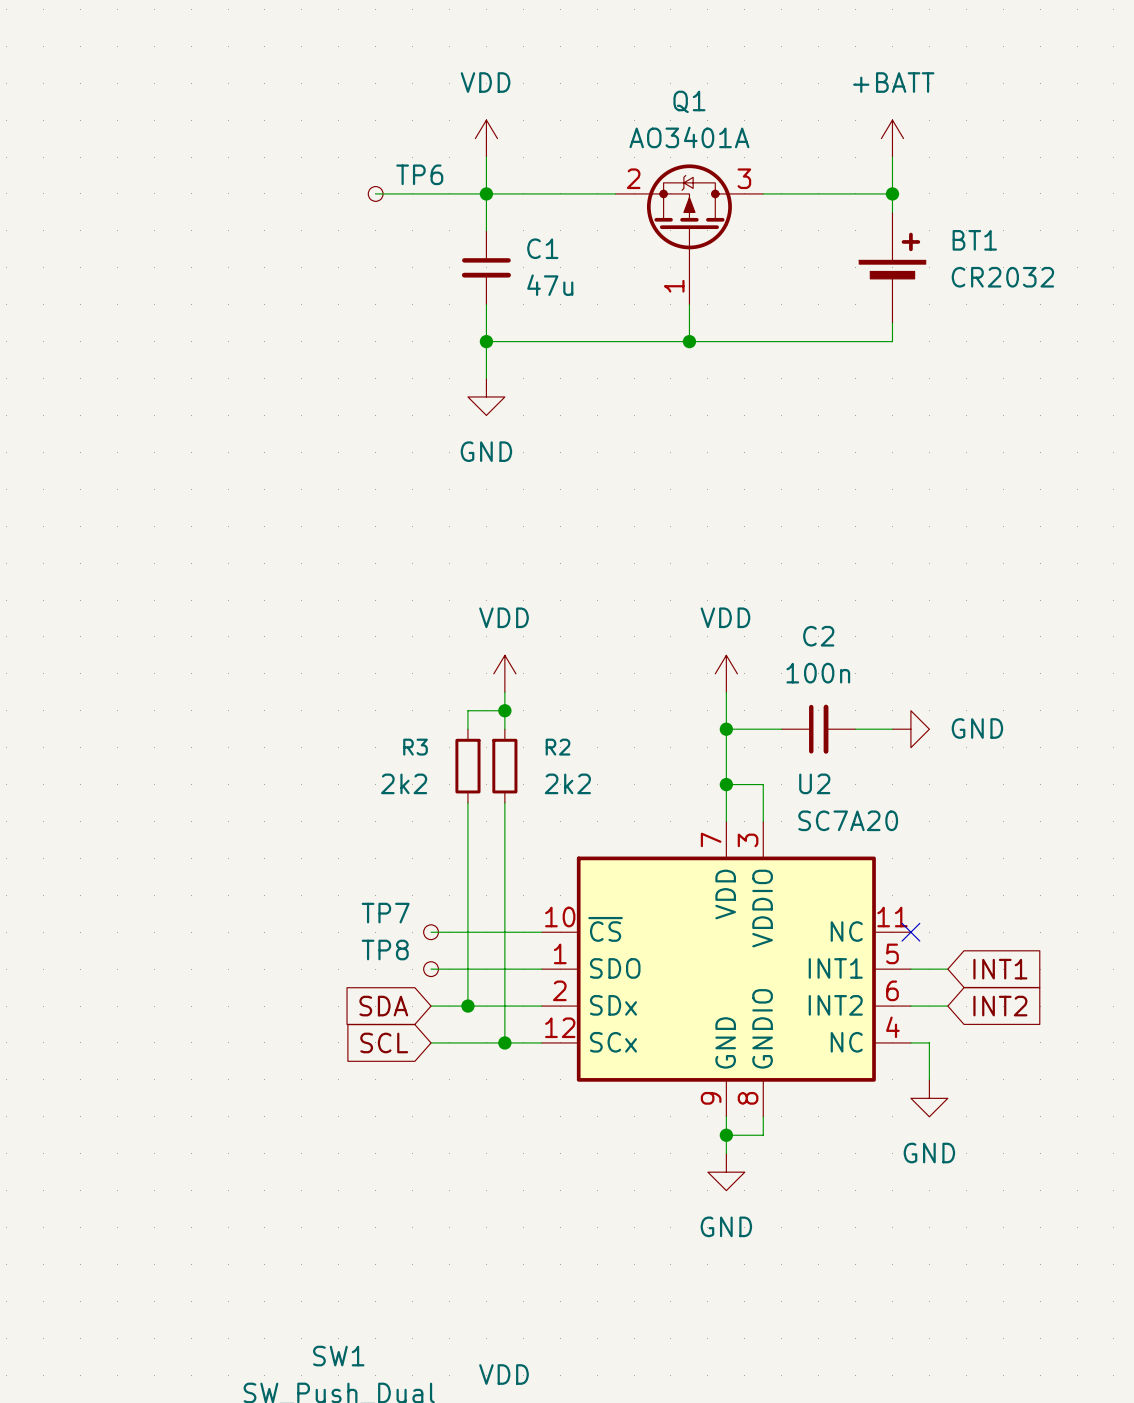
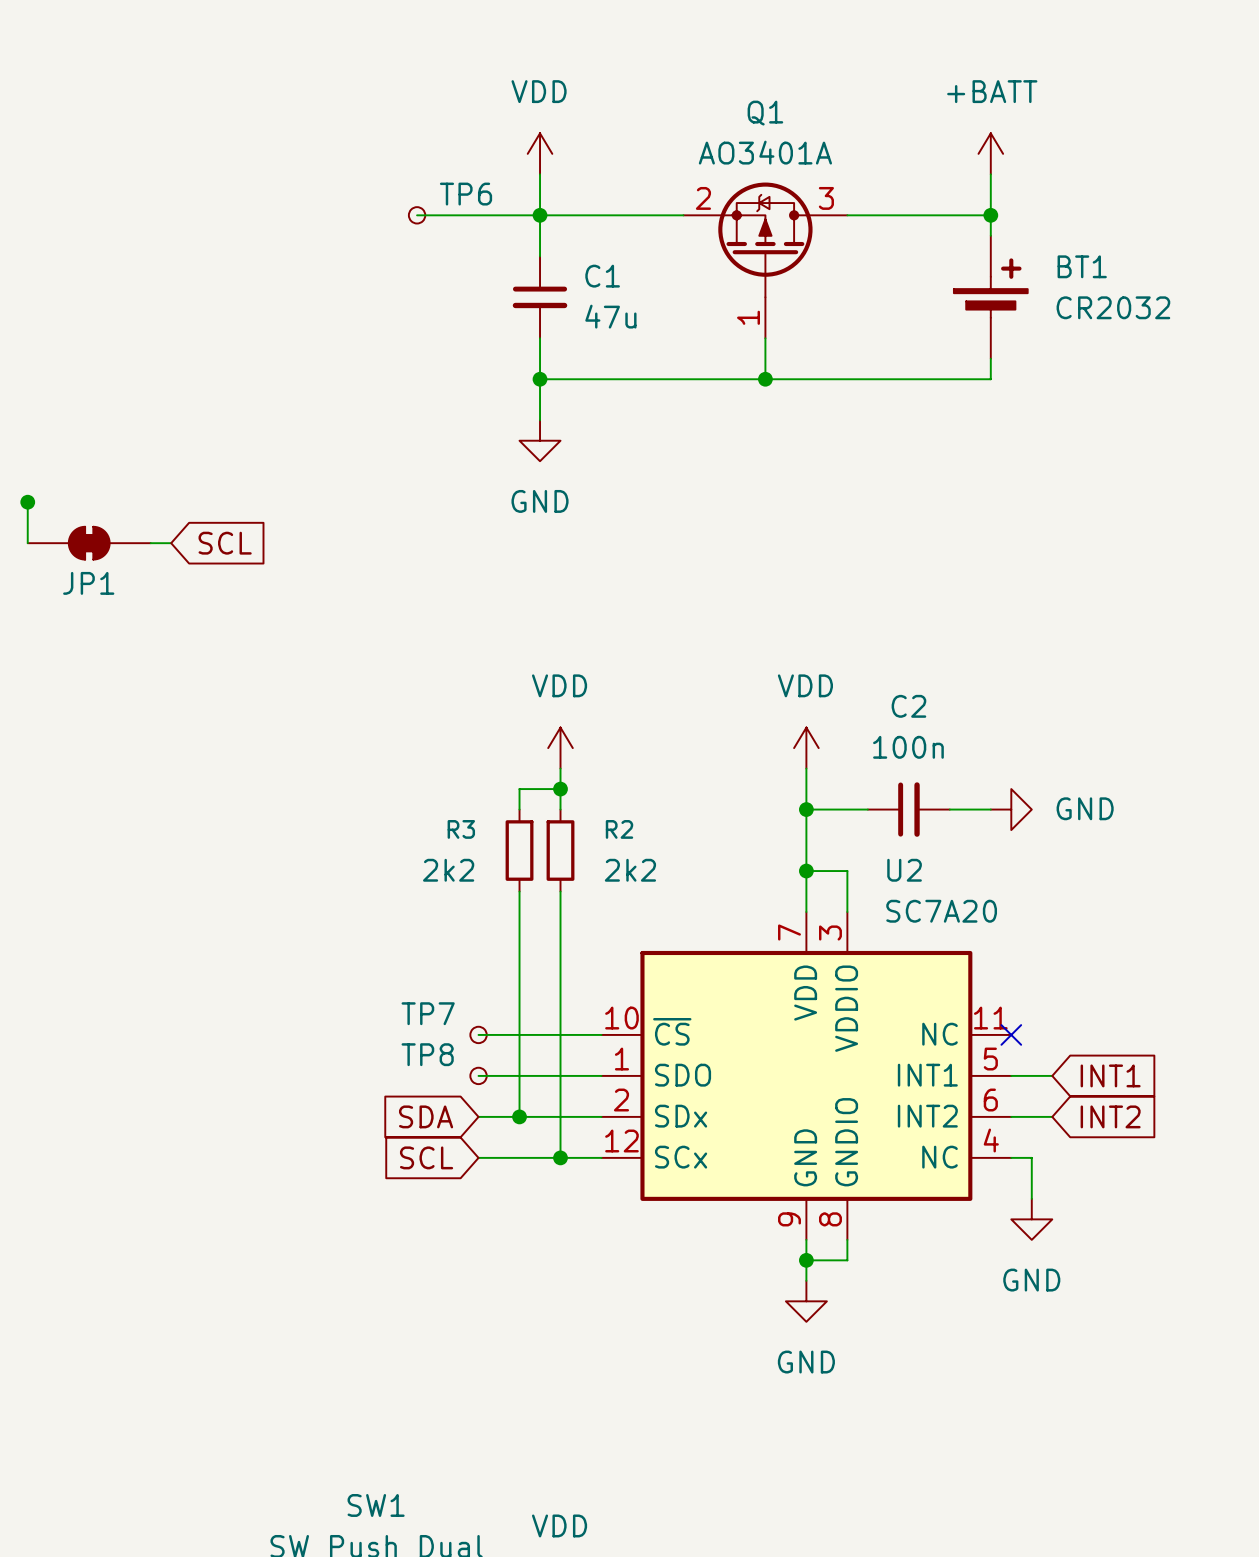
wire: none -> (27, 502) (27, 543)
junction: none -> (27, 502)
JP1: none -> (89, 543)
wire: none -> (150, 543) (171, 543)
global label: none -> SCL (225, 543)

